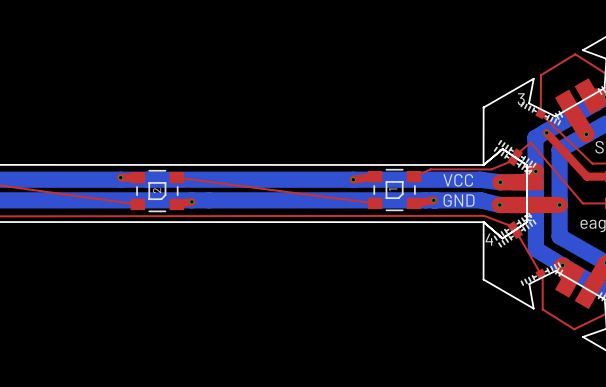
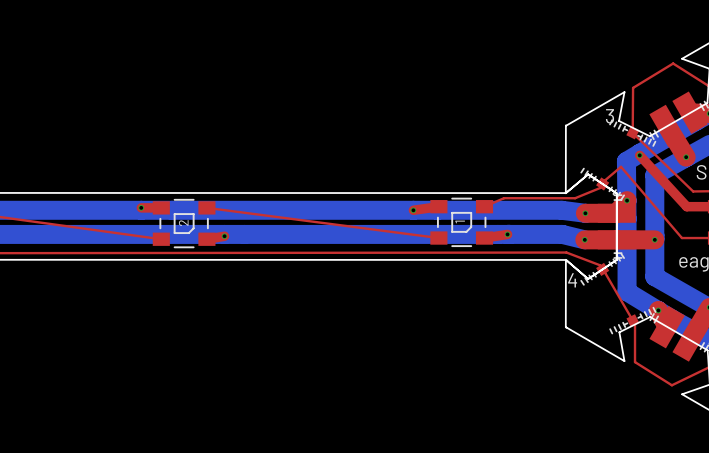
part: (517, 153) -> none
part: none -> (602, 183)
part: (512, 160) -> none
text: VCC (458, 180) -> none
text: GND (459, 200) -> none
part: (512, 226) -> none
part: none -> (602, 269)
part: (517, 233) -> none

